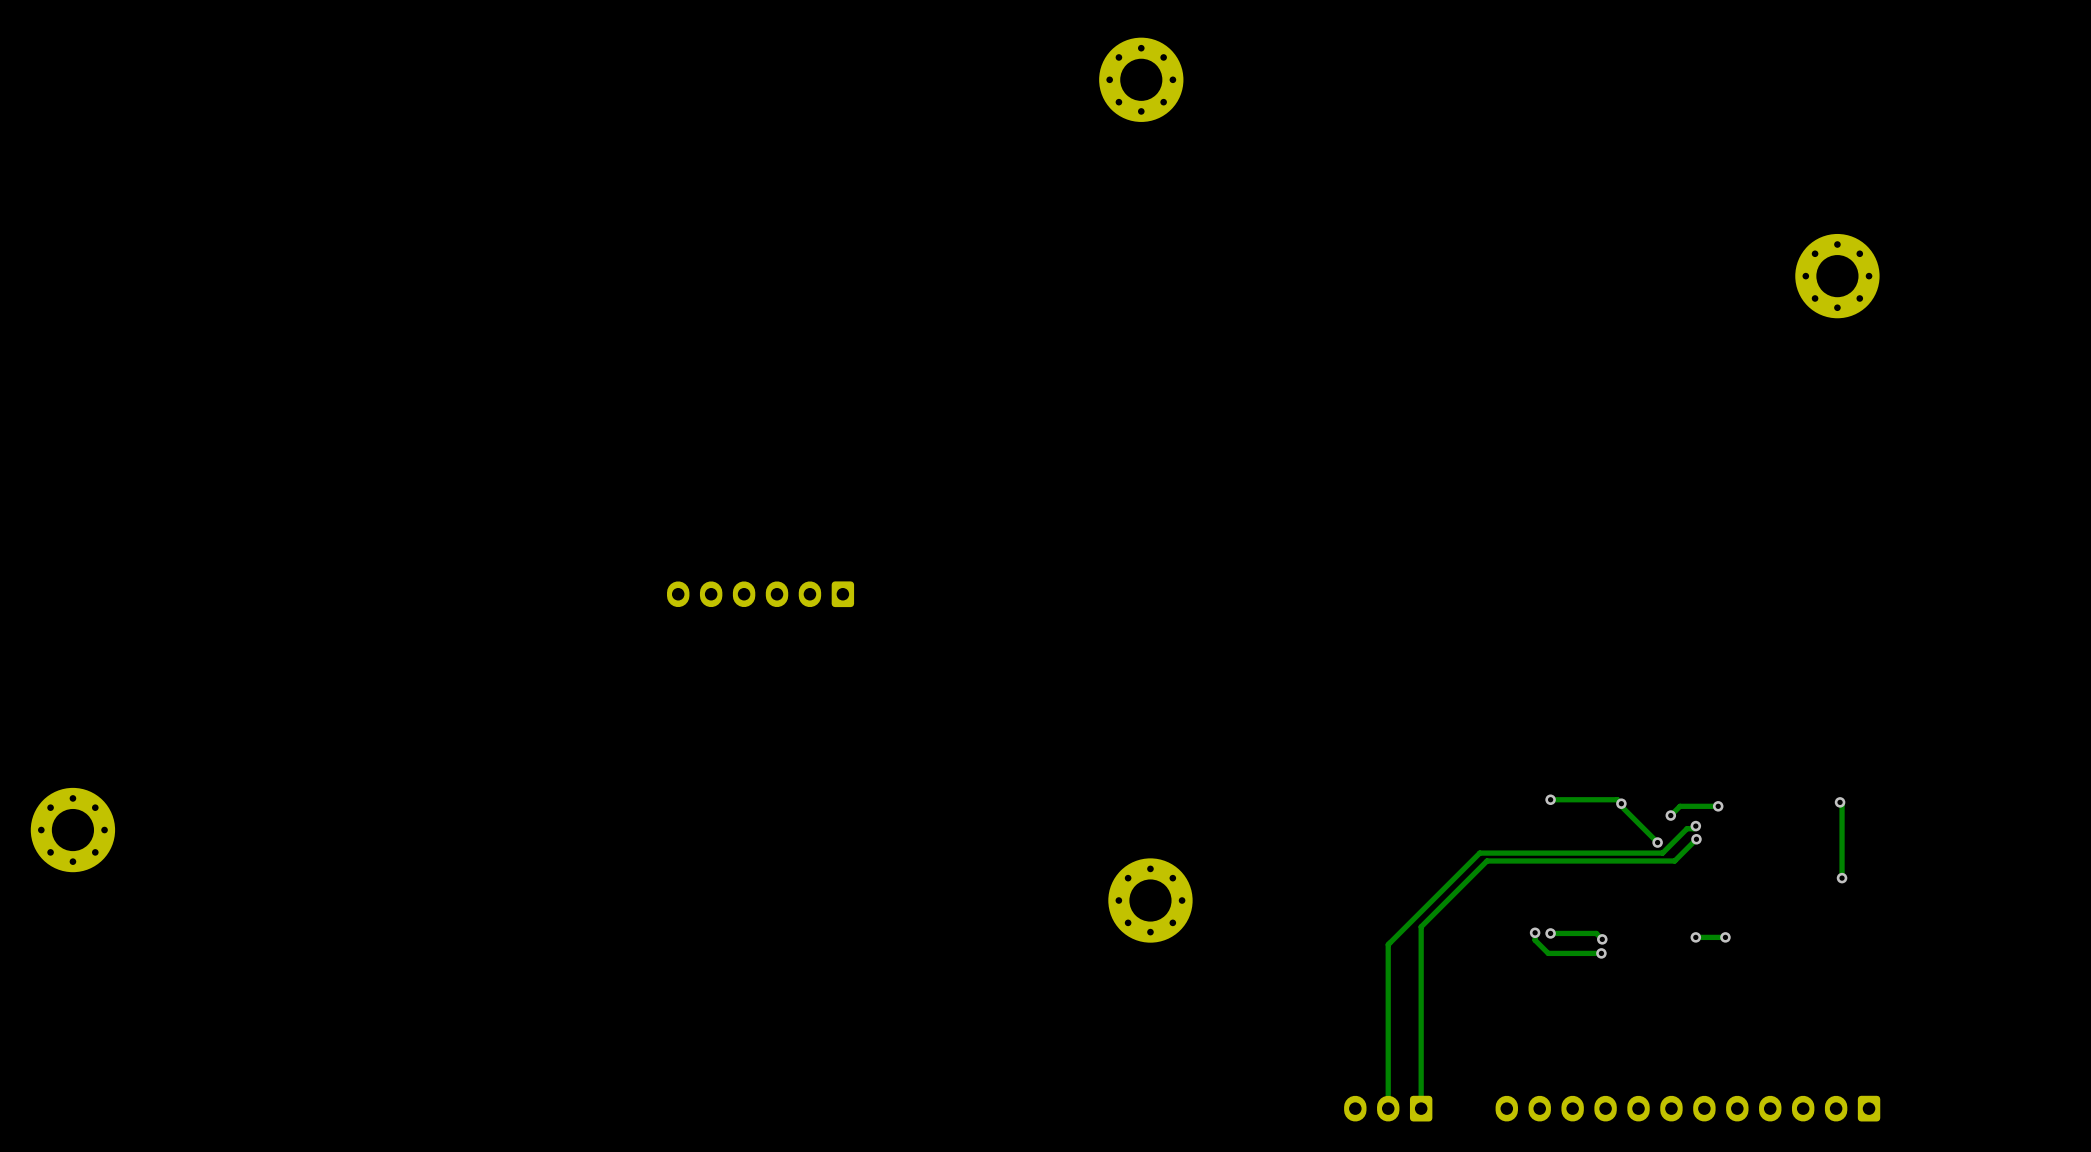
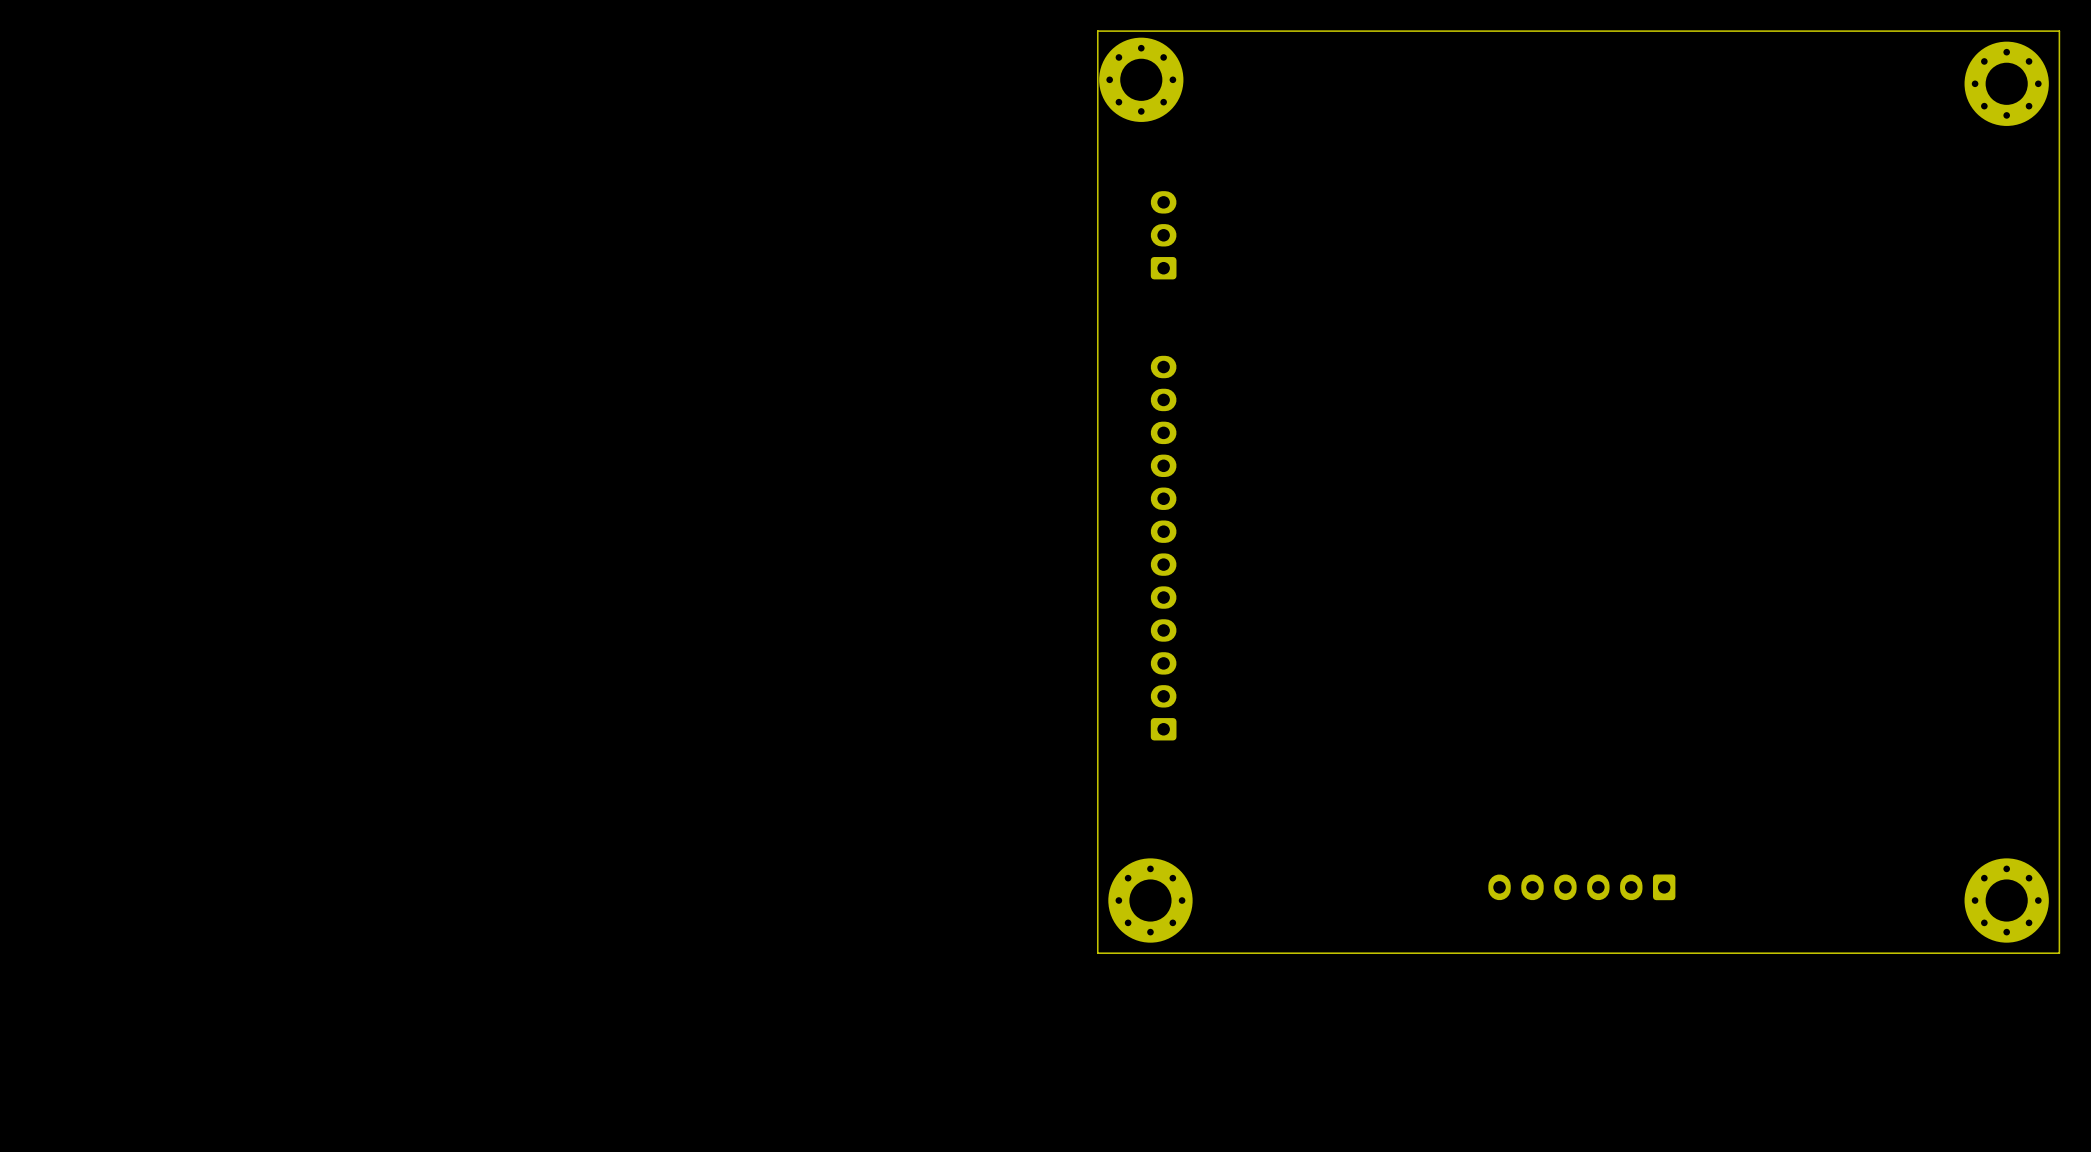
board edge: none -> (2059, 31) (2059, 953) (1097, 953) (1097, 31) (2059, 31)
part: none -> (1163, 235)
part position: (1837, 276) -> (2006, 83)
part: none -> (1163, 548)
part: (760, 594) -> none
track: (1550, 799) (1617, 799) (1621, 806) (1657, 842) -> none
via: (1550, 799) -> none
track: (1840, 802) (1842, 804) (1842, 878) -> none
via: (1840, 802) -> none
via: (1621, 803) -> none
track: (1718, 806) (1680, 806) (1670, 815) -> none
via: (1718, 806) -> none
via: (1670, 815) -> none
track: (1695, 826) (1693, 828) (1687, 828) (1662, 853) (1479, 853) (1388, 944) (1388, 1108) -> none
via: (1695, 826) -> none
part: (72, 830) -> none
track: (1696, 839) (1674, 860) (1487, 860) (1421, 926) (1421, 1108) -> none
via: (1696, 839) -> none
via: (1657, 842) -> none
via: (1842, 878) -> none
part: none -> (1581, 887)
part: none -> (2006, 900)
track: (1535, 932) (1535, 940) (1548, 953) (1601, 953) -> none
via: (1535, 932) -> none
track: (1550, 933) (1596, 933) (1602, 939) -> none
via: (1550, 933) -> none
via: (1695, 937) -> none
track: (1725, 937) (1695, 937) -> none
via: (1725, 937) -> none
via: (1602, 939) -> none
via: (1601, 953) -> none
part: (1388, 1108) -> none
part: (1687, 1108) -> none

